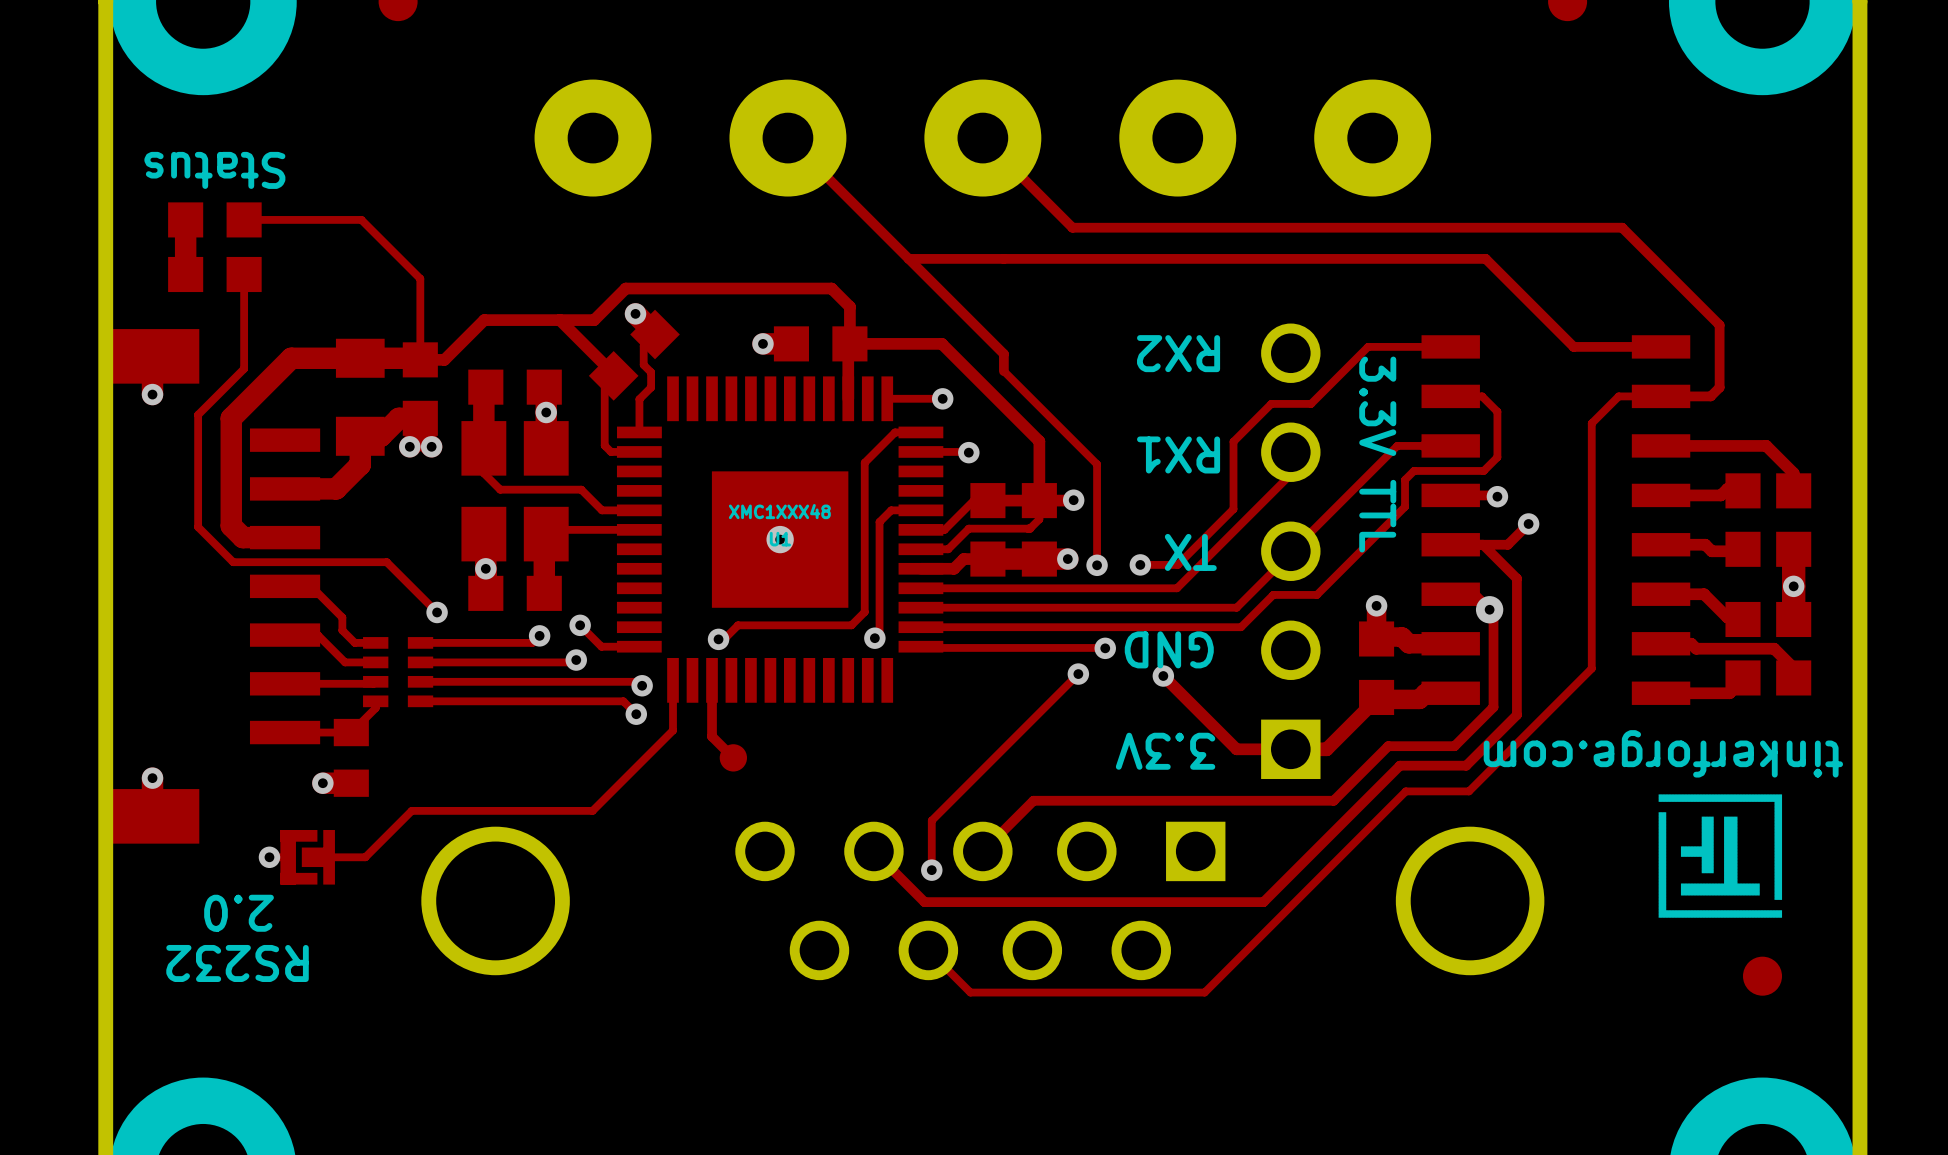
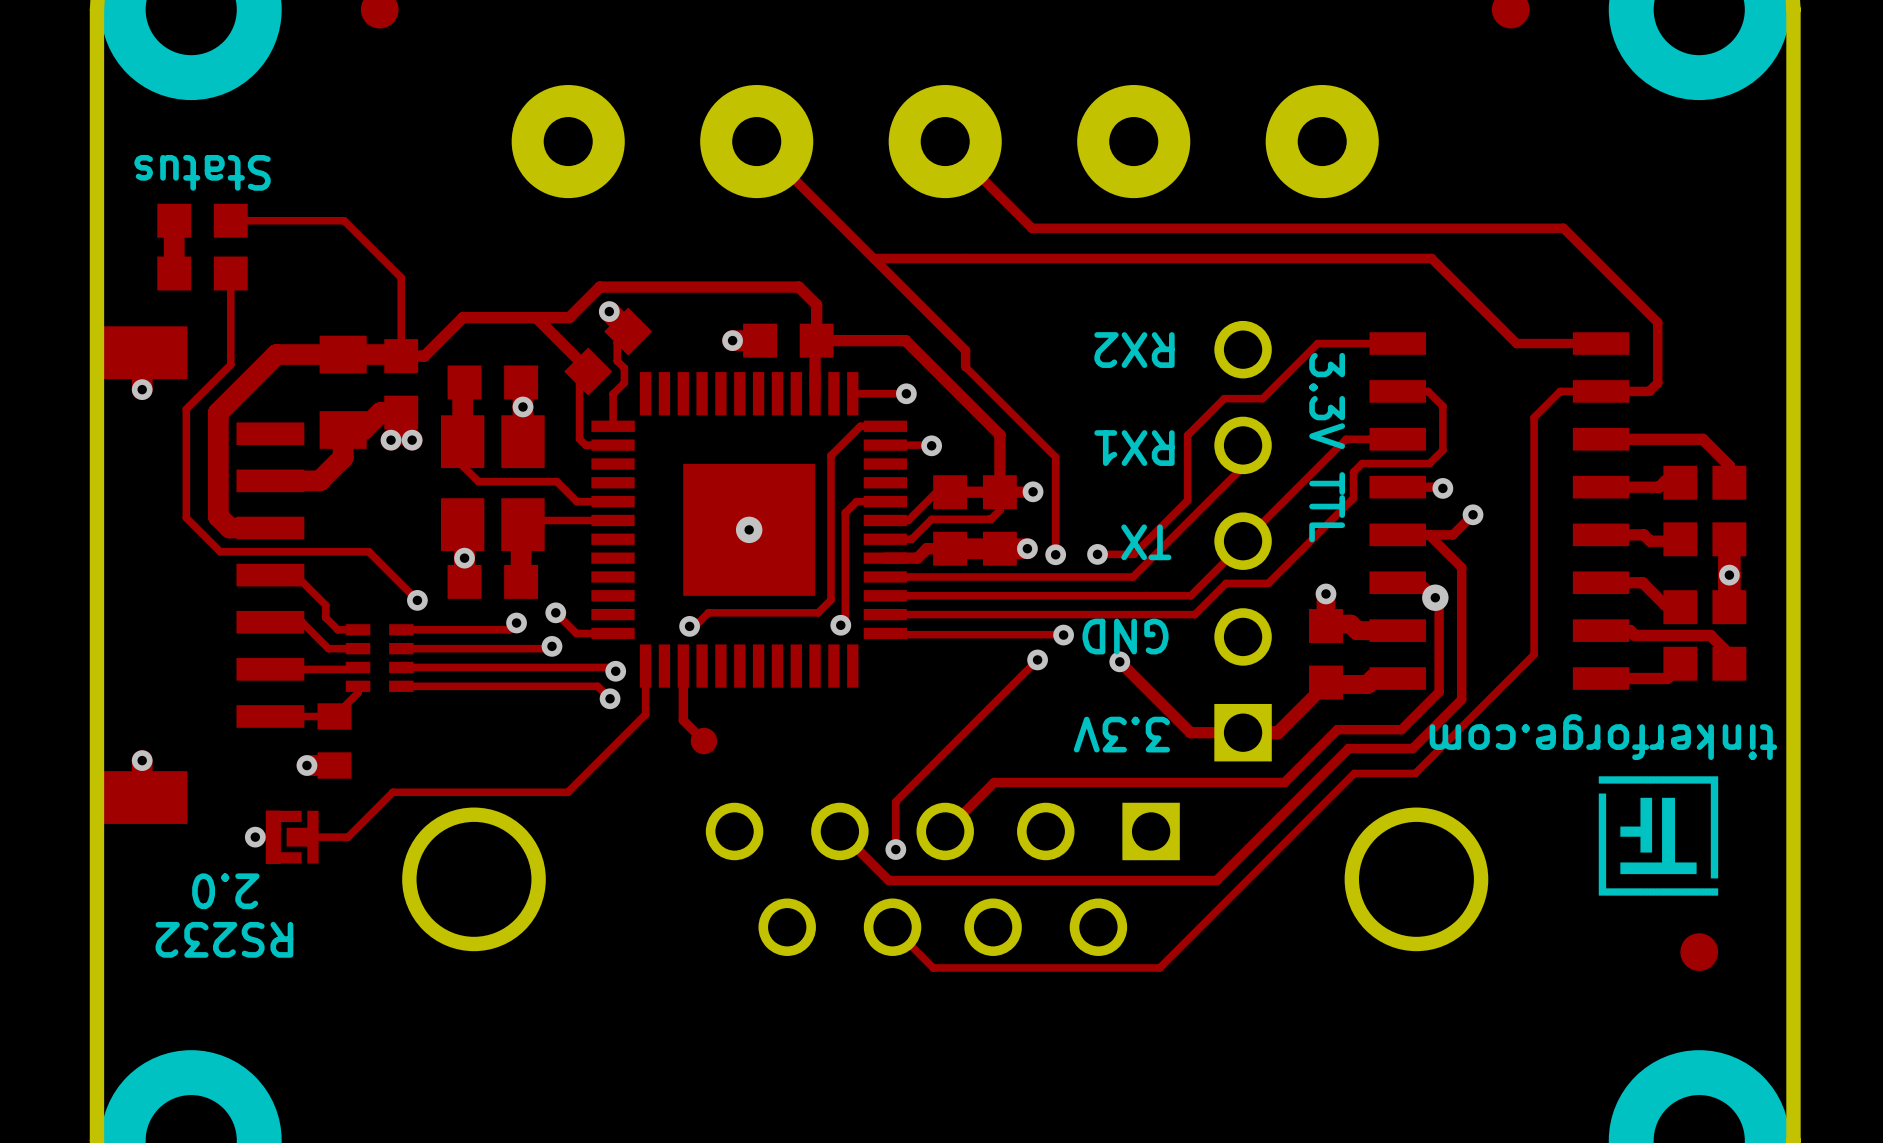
U1 value: XMC1XXX48 (779, 511) -> none
U1 name: U1 (780, 539) -> none

